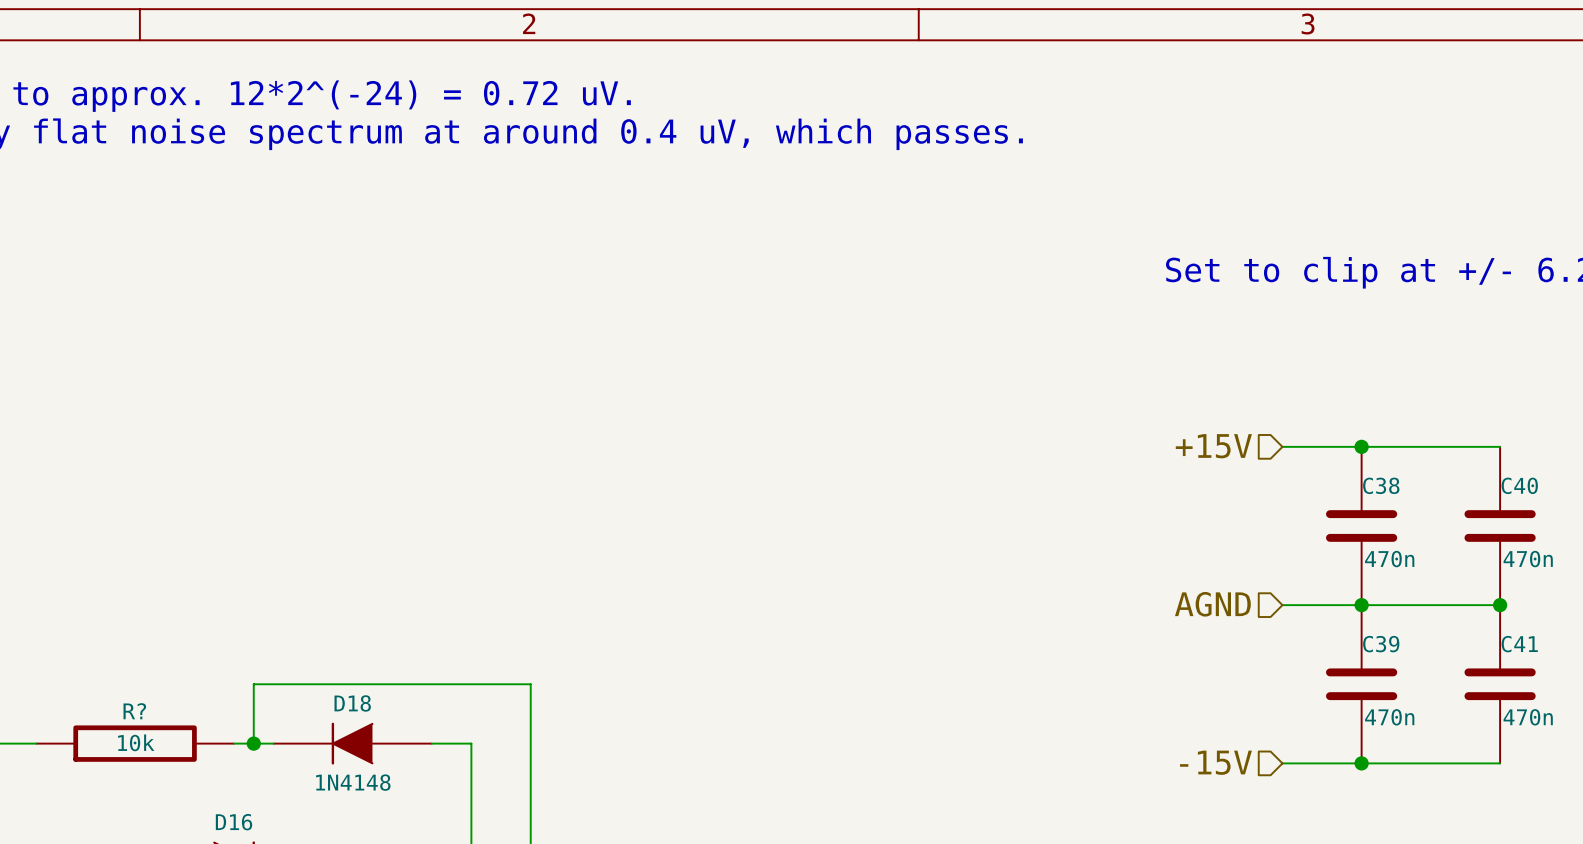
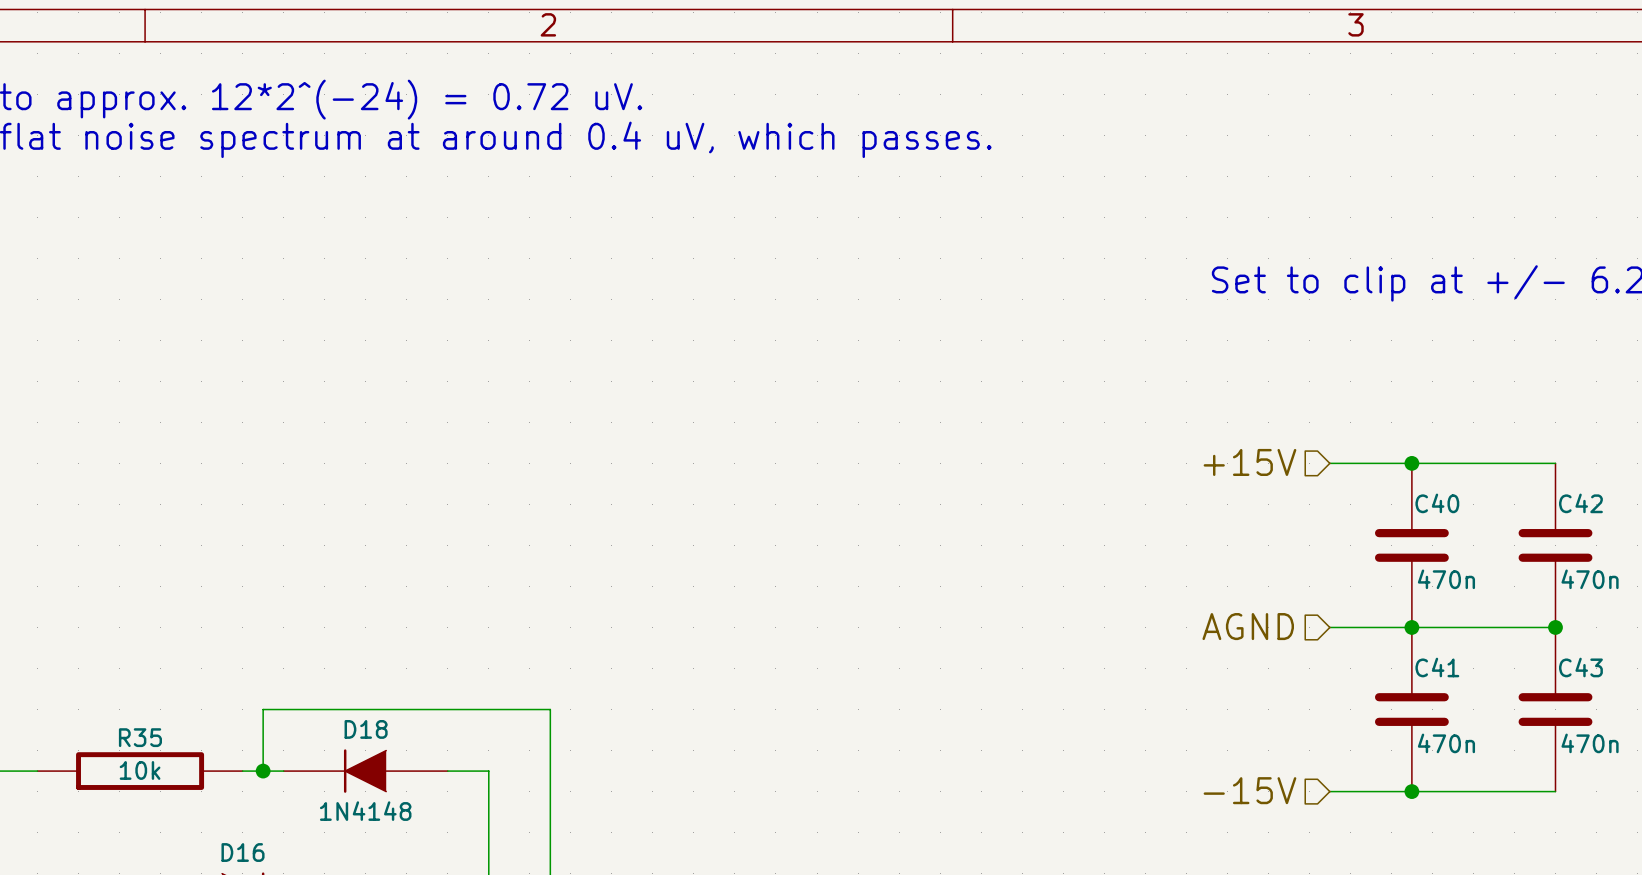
C38 name: C38 (1381, 485) -> C40 (1437, 503)
C40 name: C40 (1519, 485) -> C42 (1580, 503)
C39 name: C39 (1381, 644) -> C41 (1437, 667)
C41 name: C41 (1519, 644) -> C43 (1580, 667)
R? name: R? (134, 711) -> R35 (140, 737)

